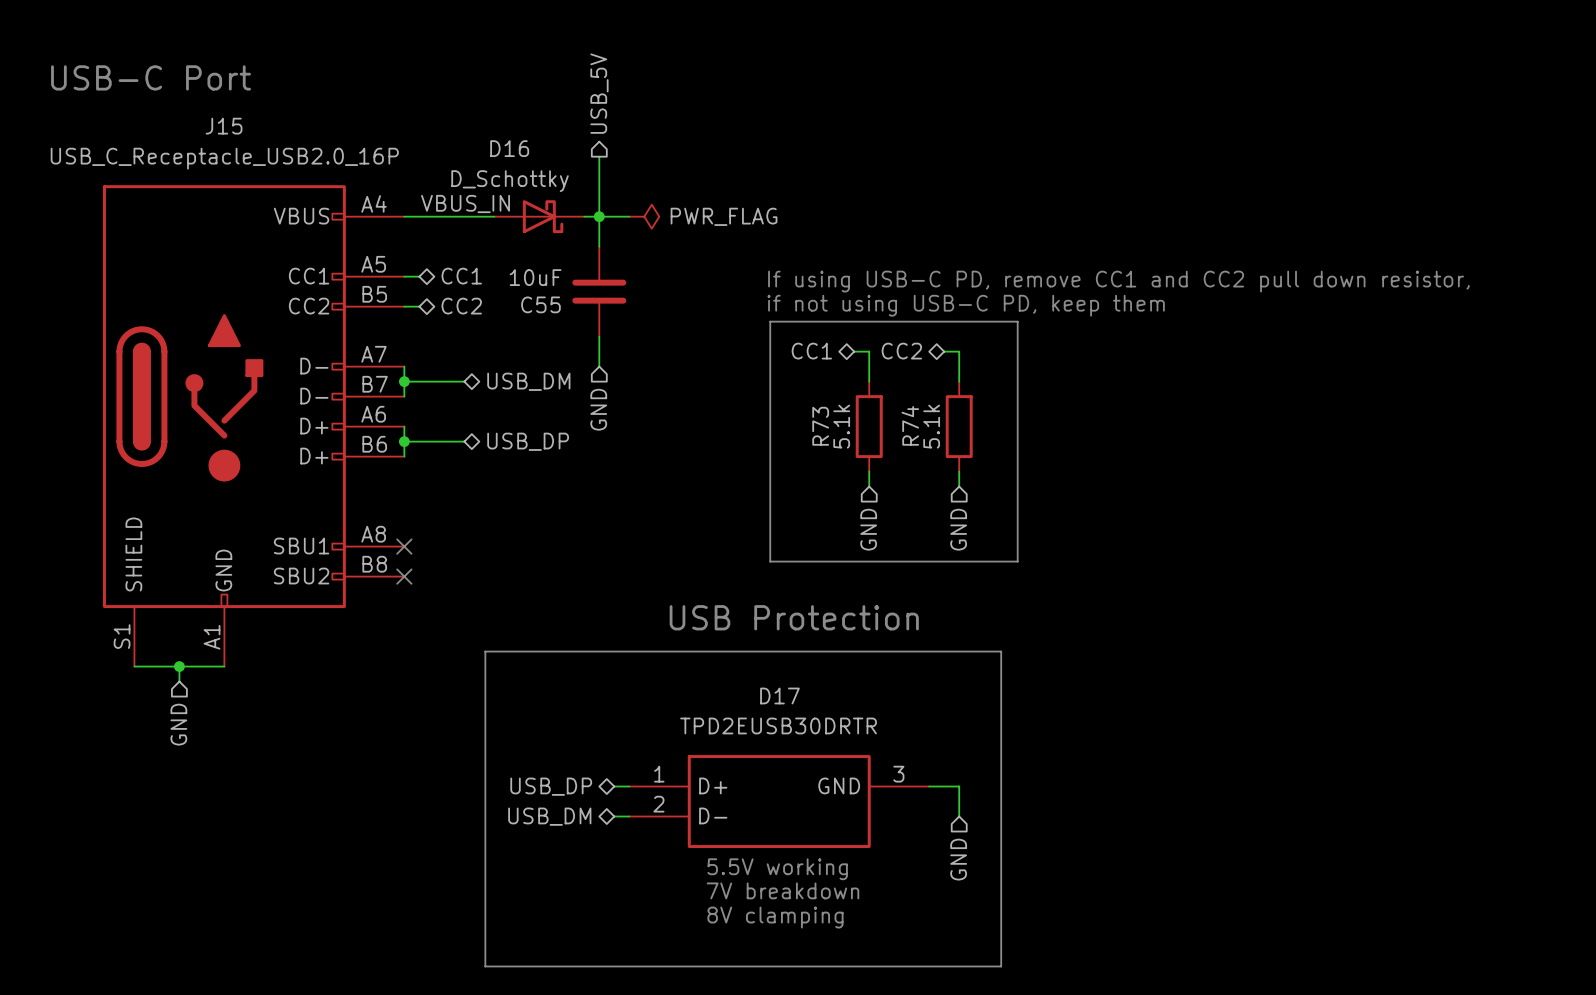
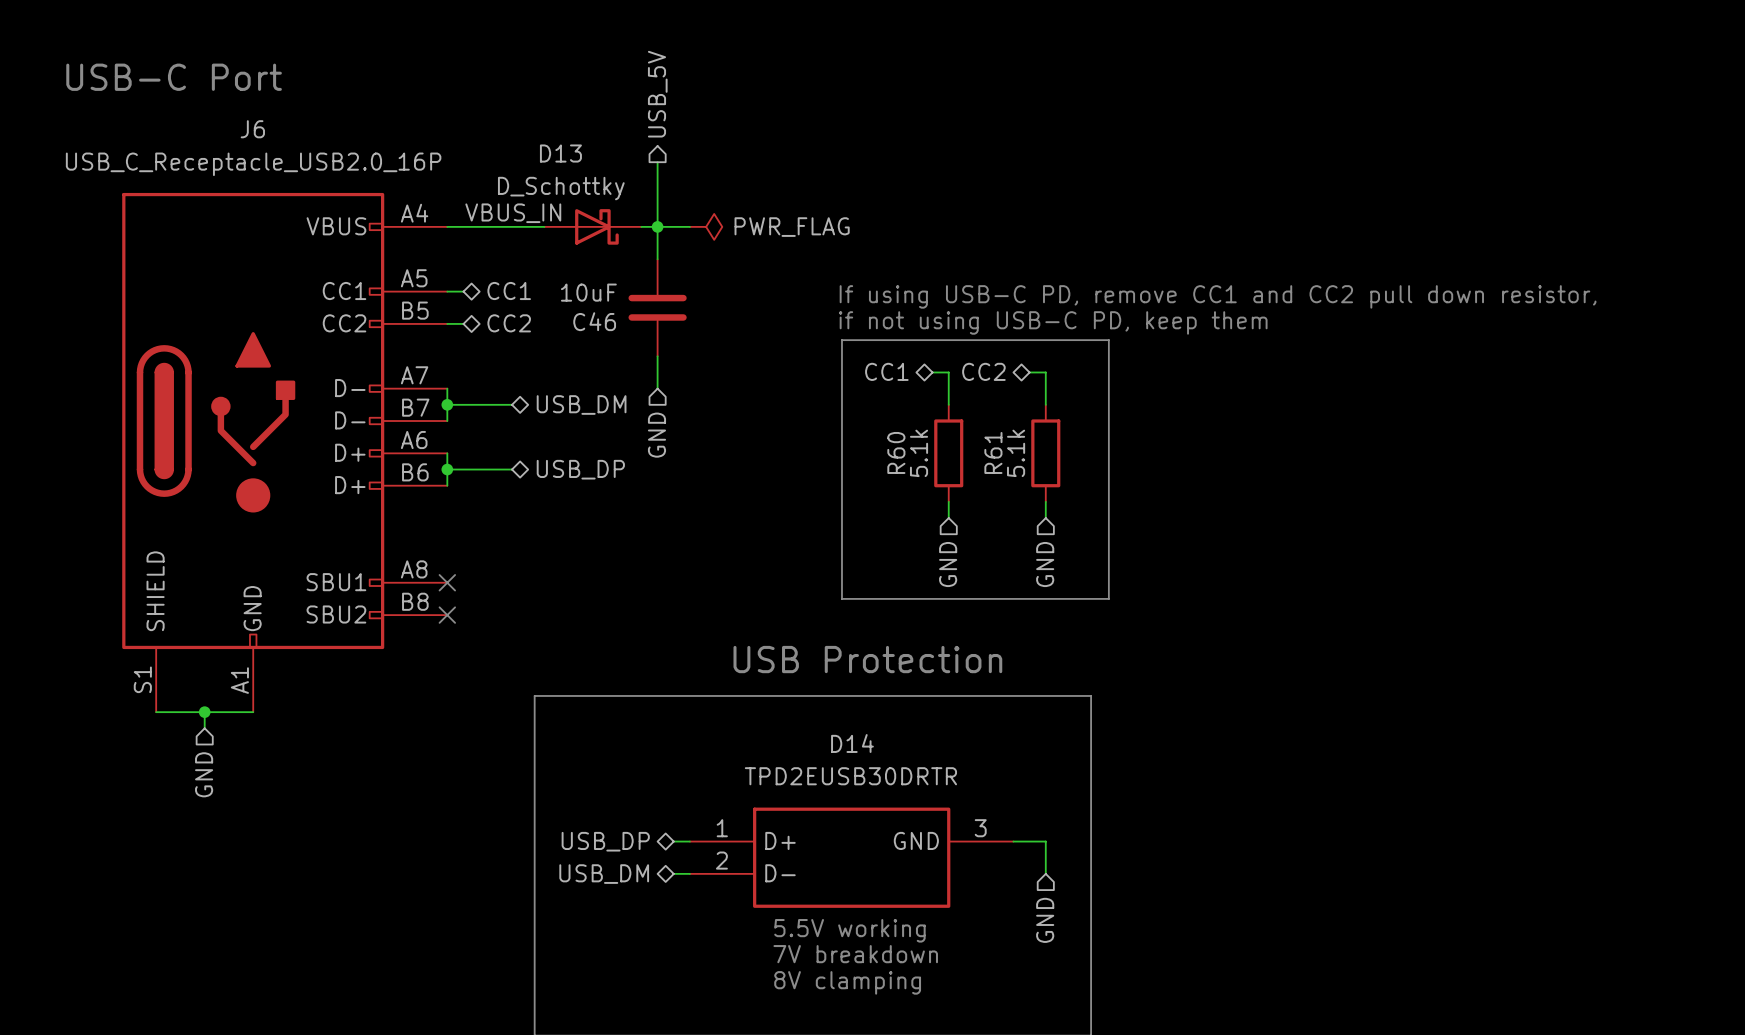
J15 name: J15 (224, 126) -> J6 (252, 129)
D16 name: D16 (509, 148) -> D13 (560, 153)
C55 name: C55 (540, 304) -> C46 (594, 321)
R74 name: R74 (910, 425) -> R61 (993, 452)
R73 name: R73 (820, 426) -> R60 (896, 452)
D17 name: D17 (779, 695) -> D14 (852, 743)

